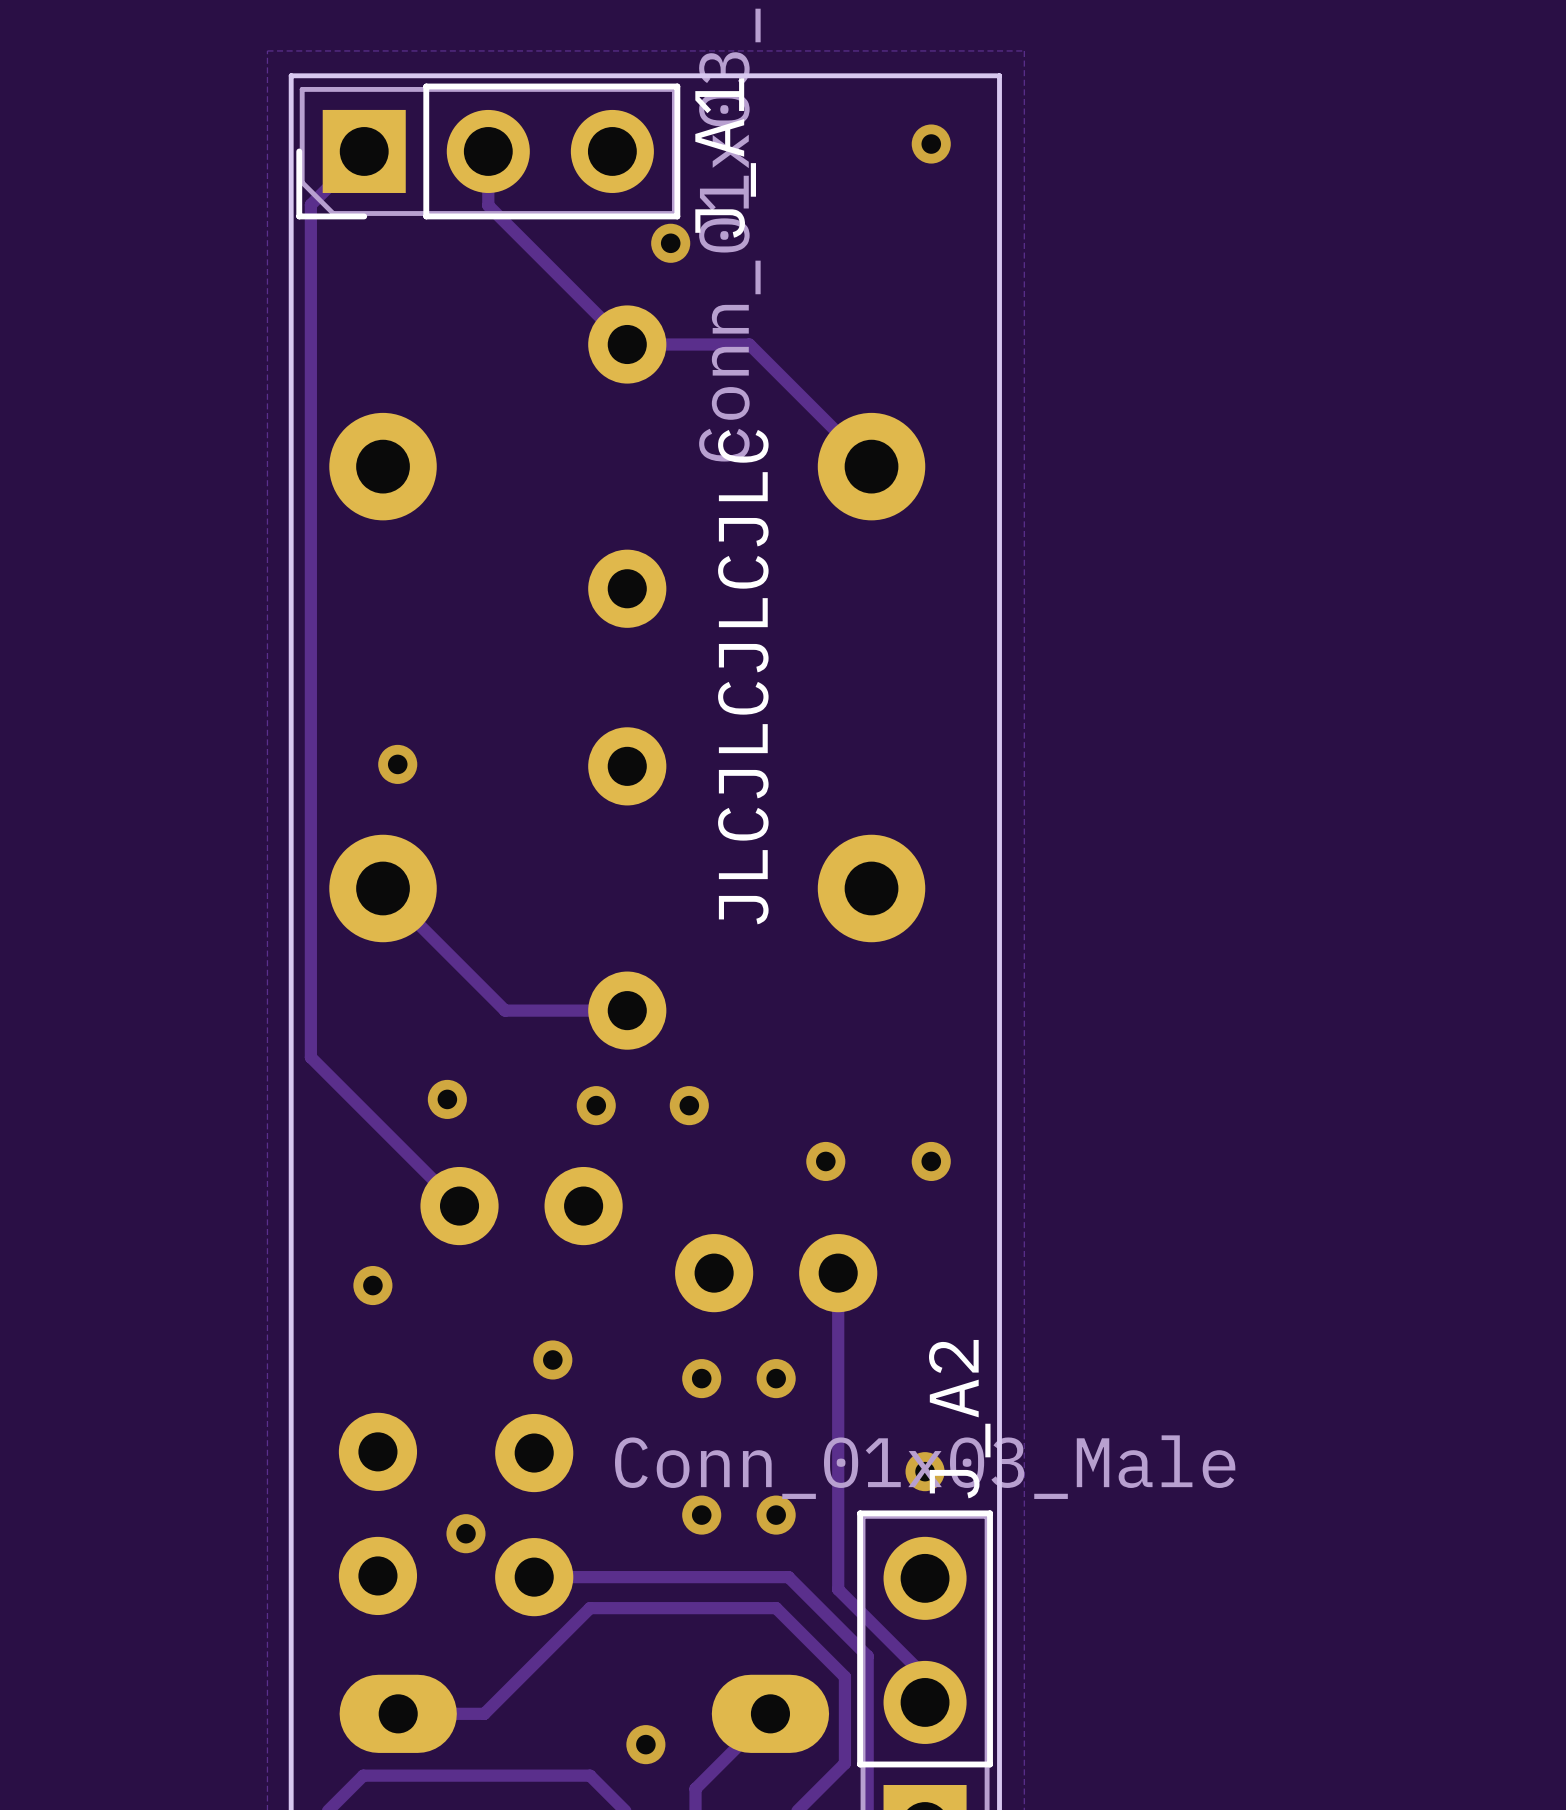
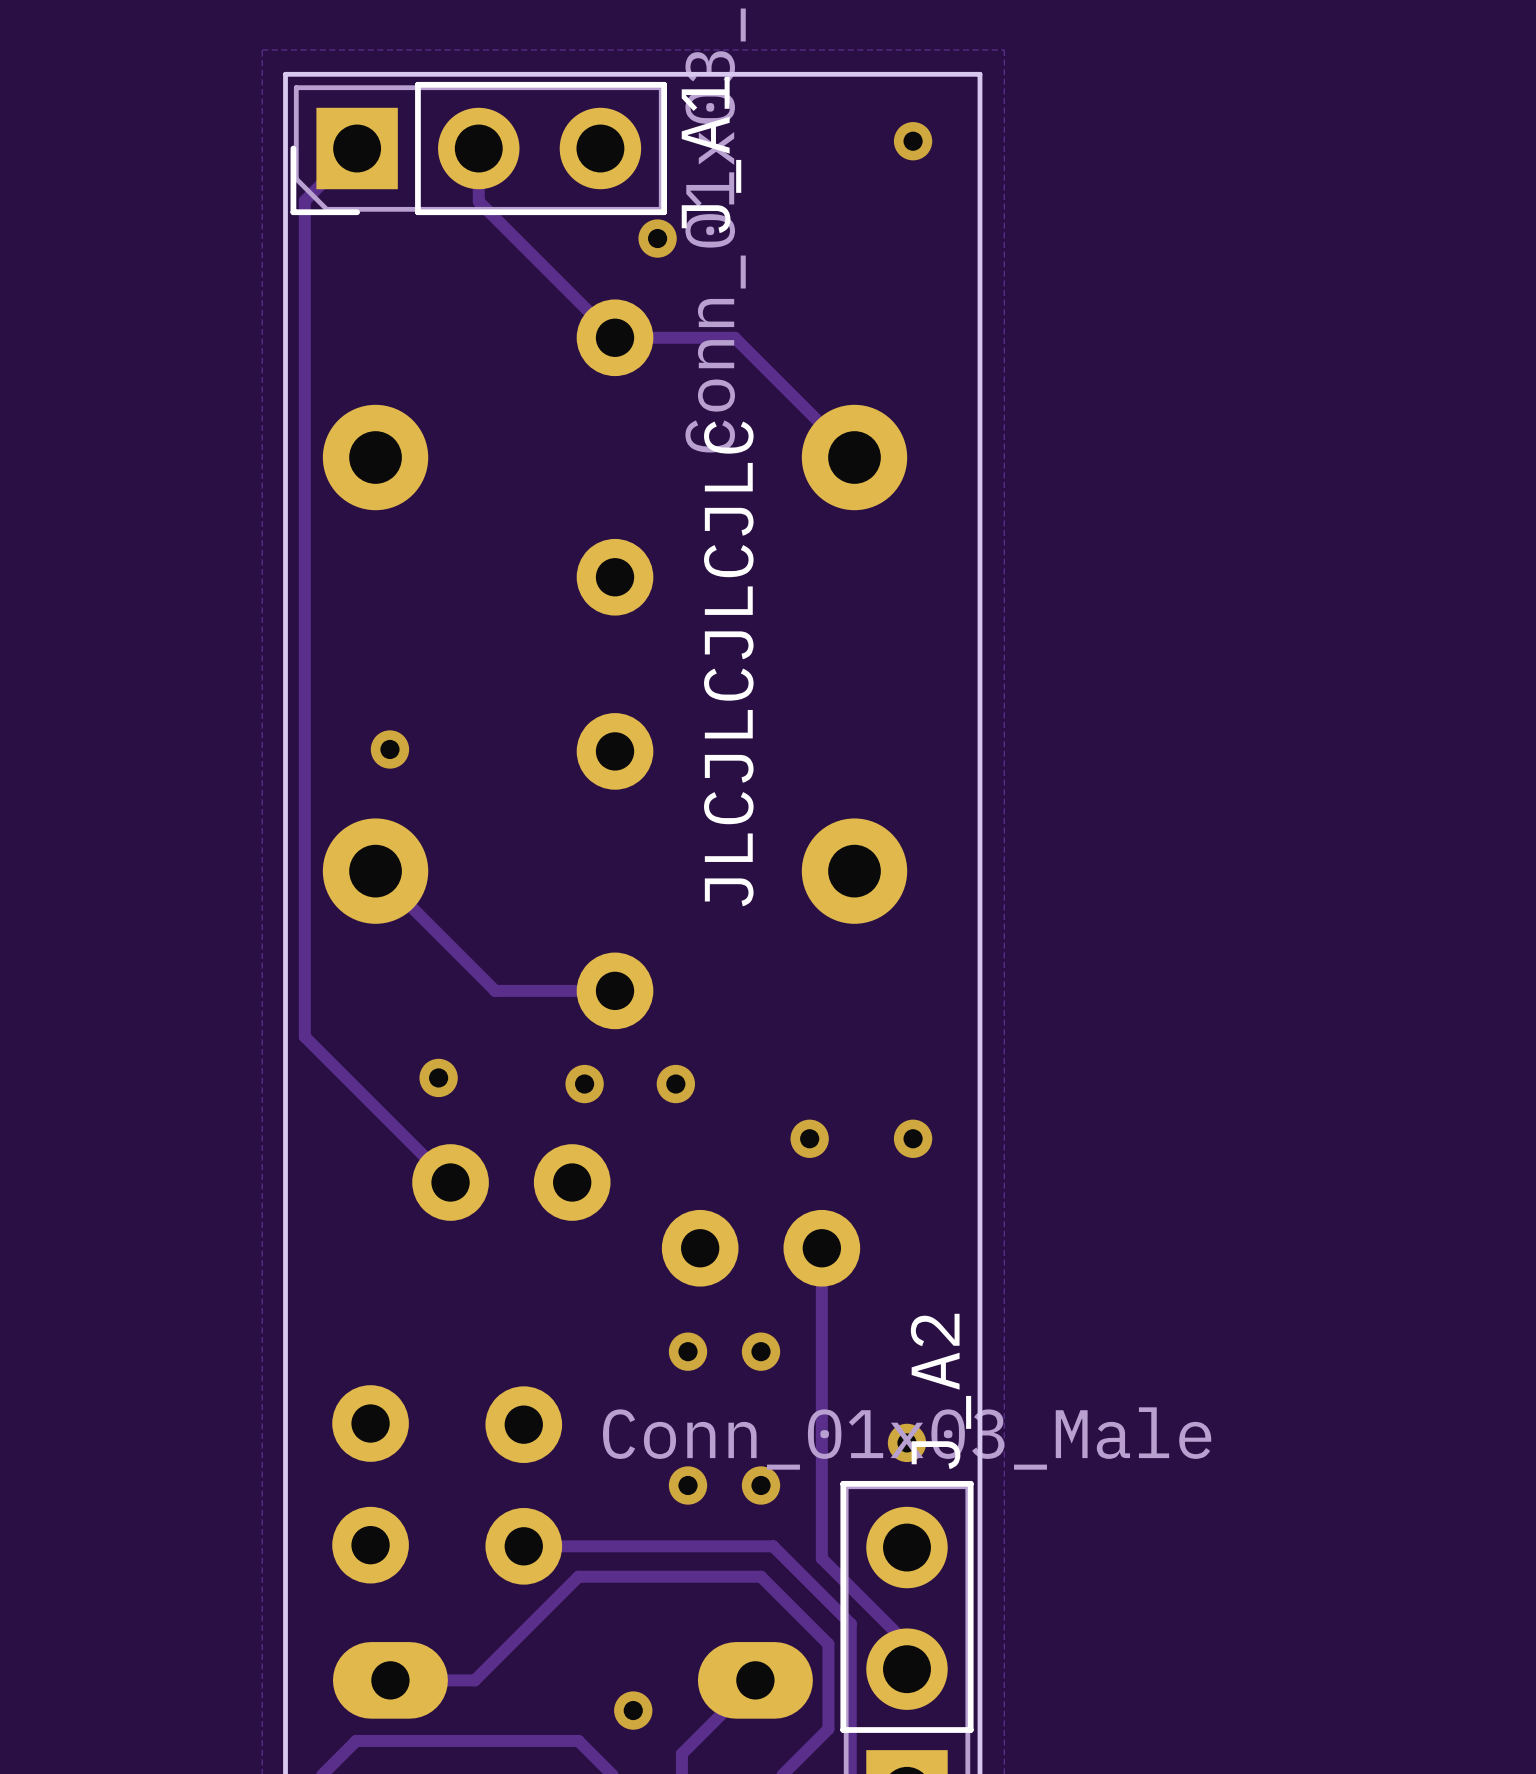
via: (372, 1285) -> none
via: (552, 1359) -> none
via: (465, 1533) -> none

